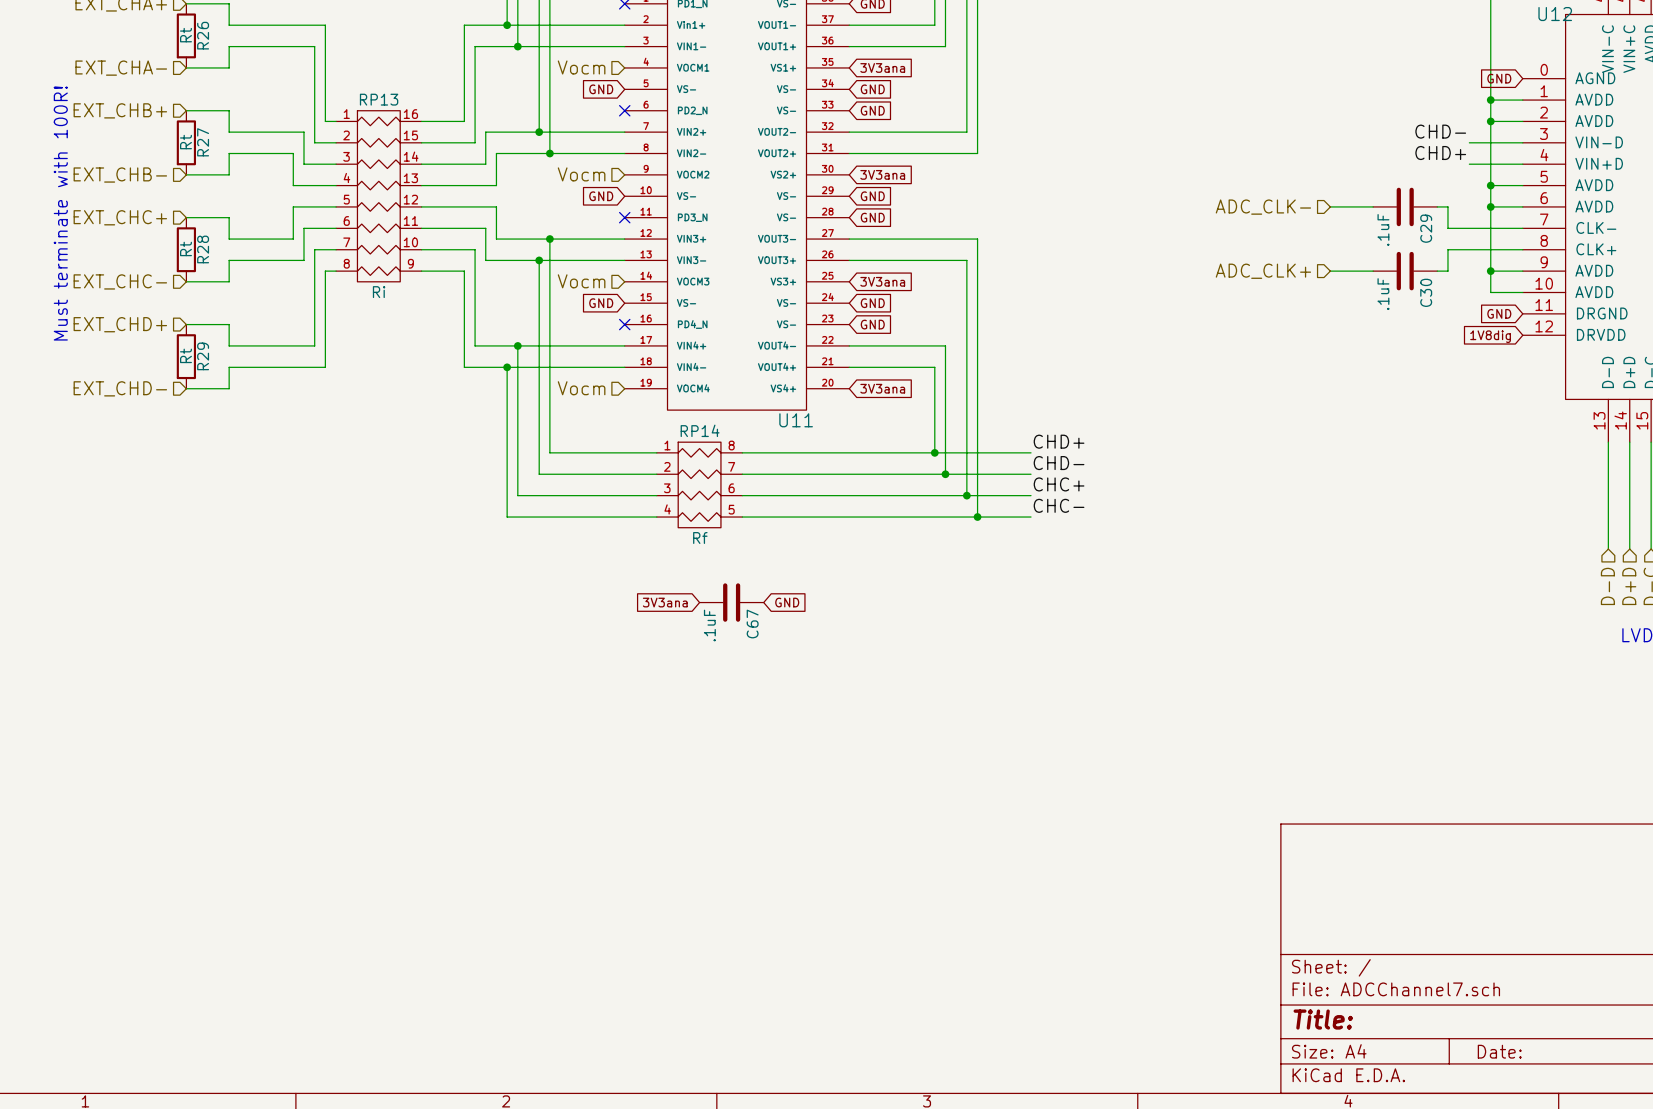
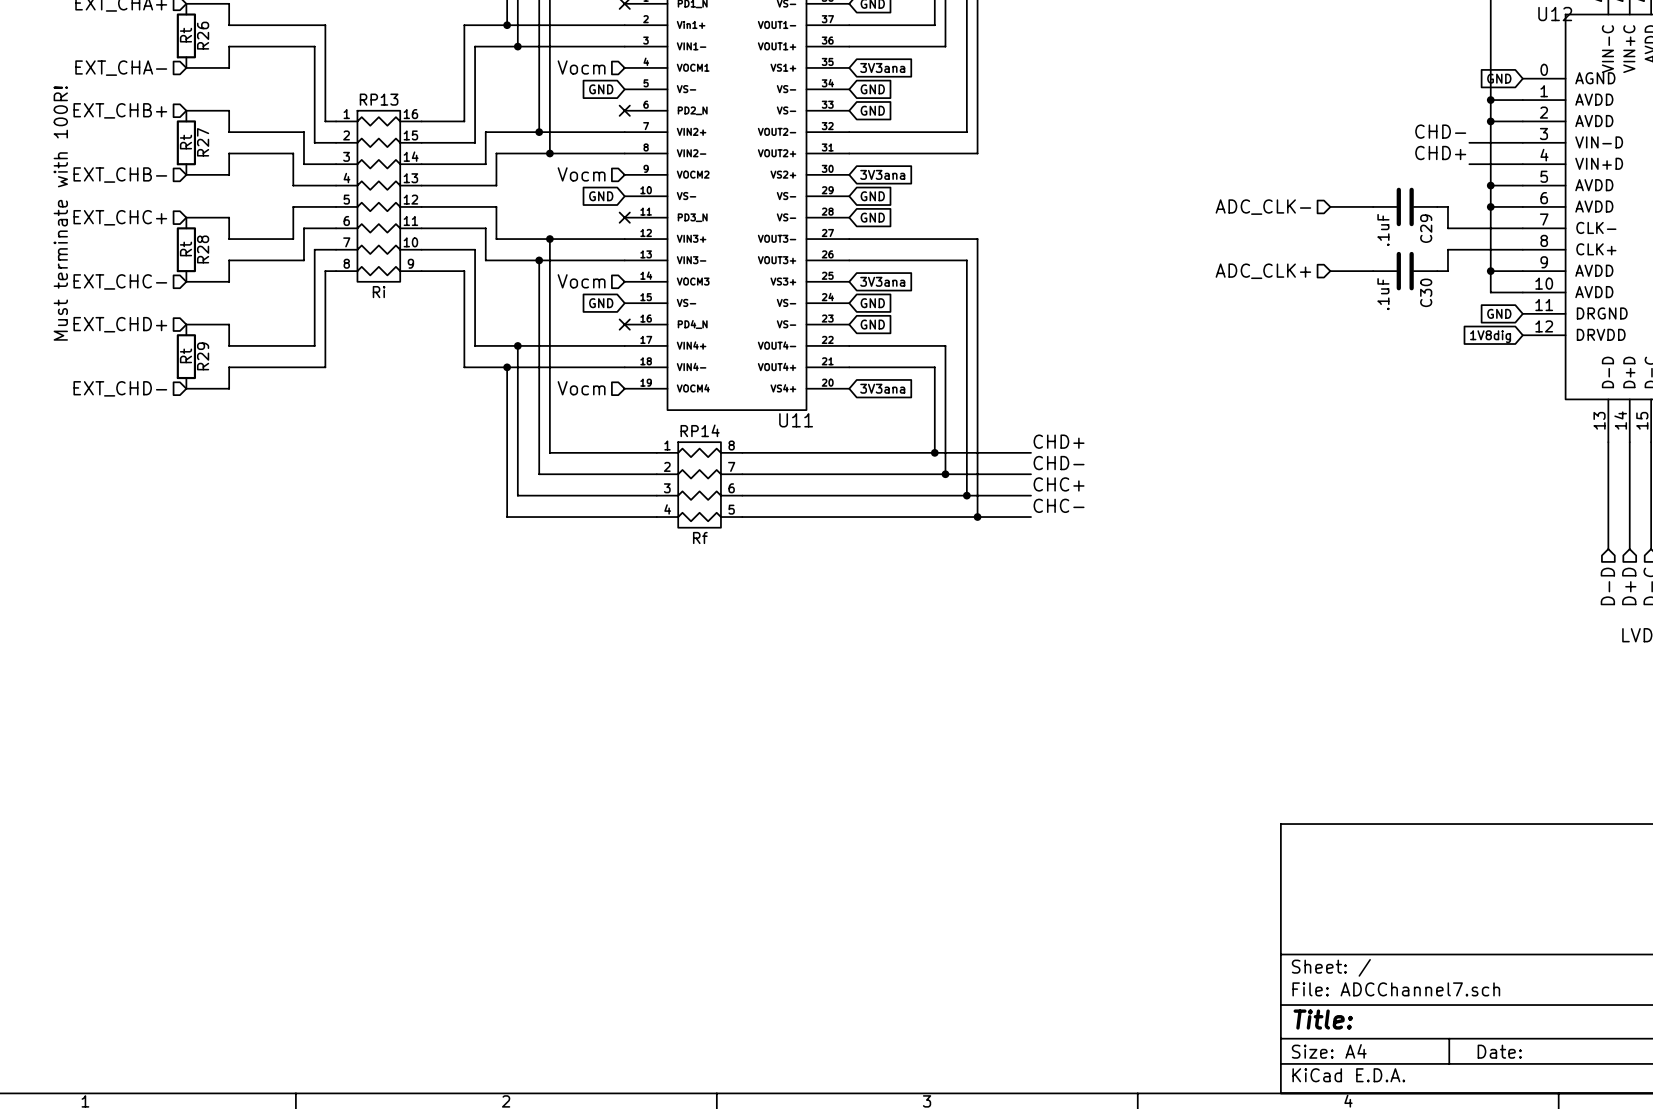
global label: 3V3ana (665, 602) -> none
C67: .1uF (731, 602) -> none
global label: GND (787, 602) -> none

